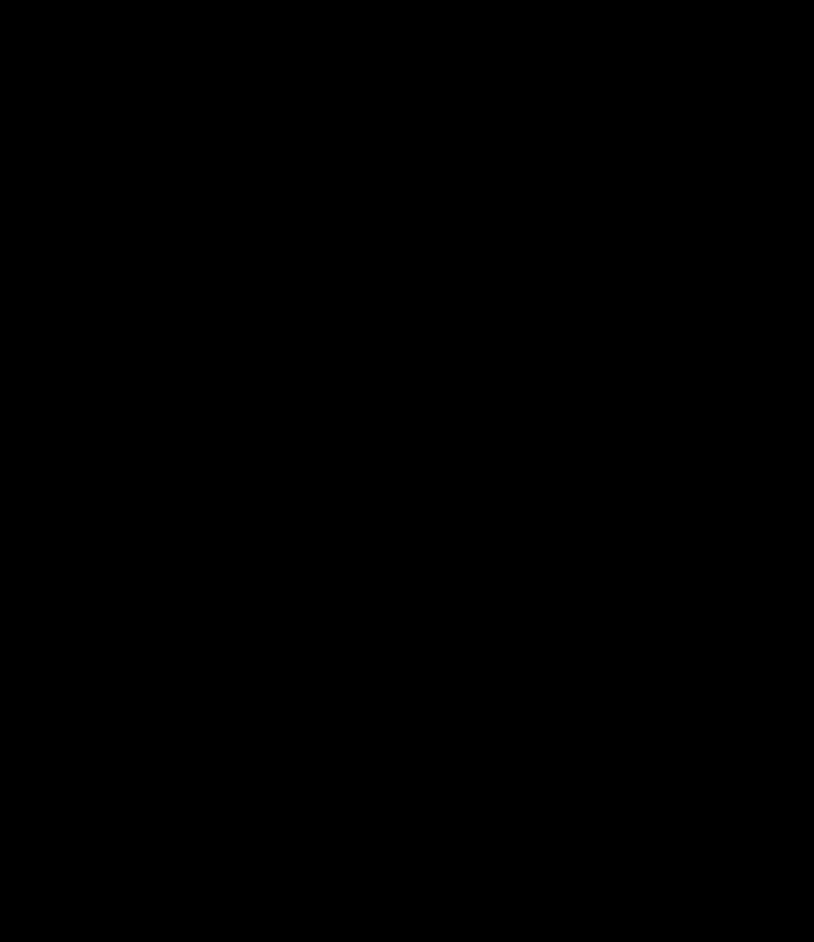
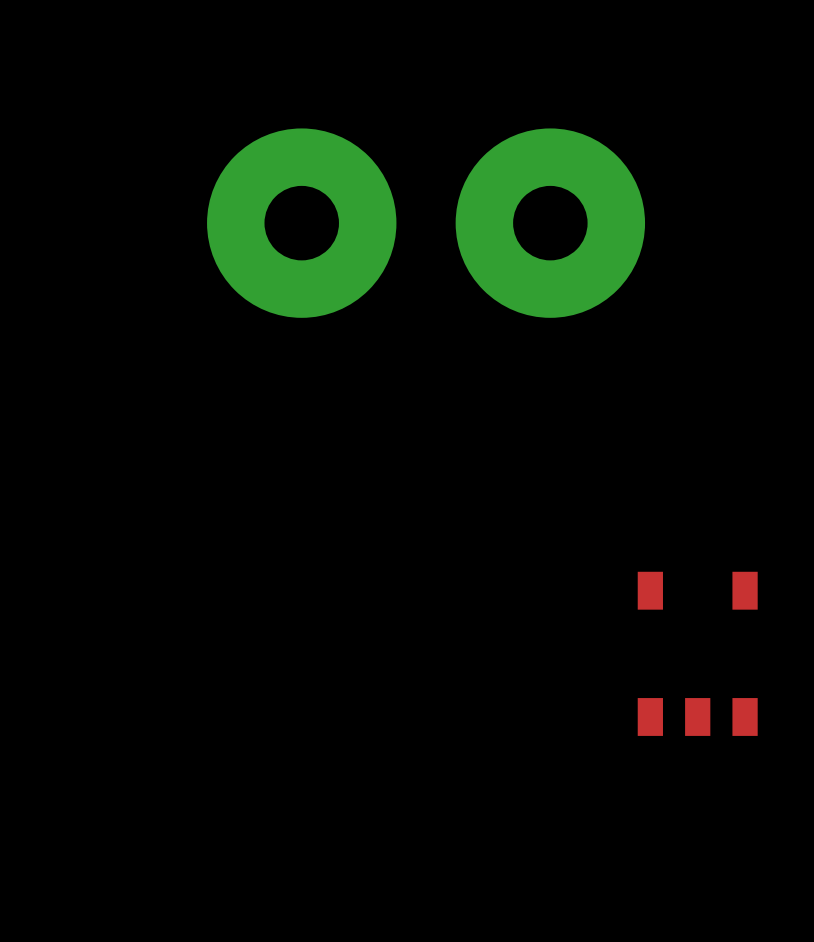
part: none -> (426, 223)
part: none -> (697, 653)

